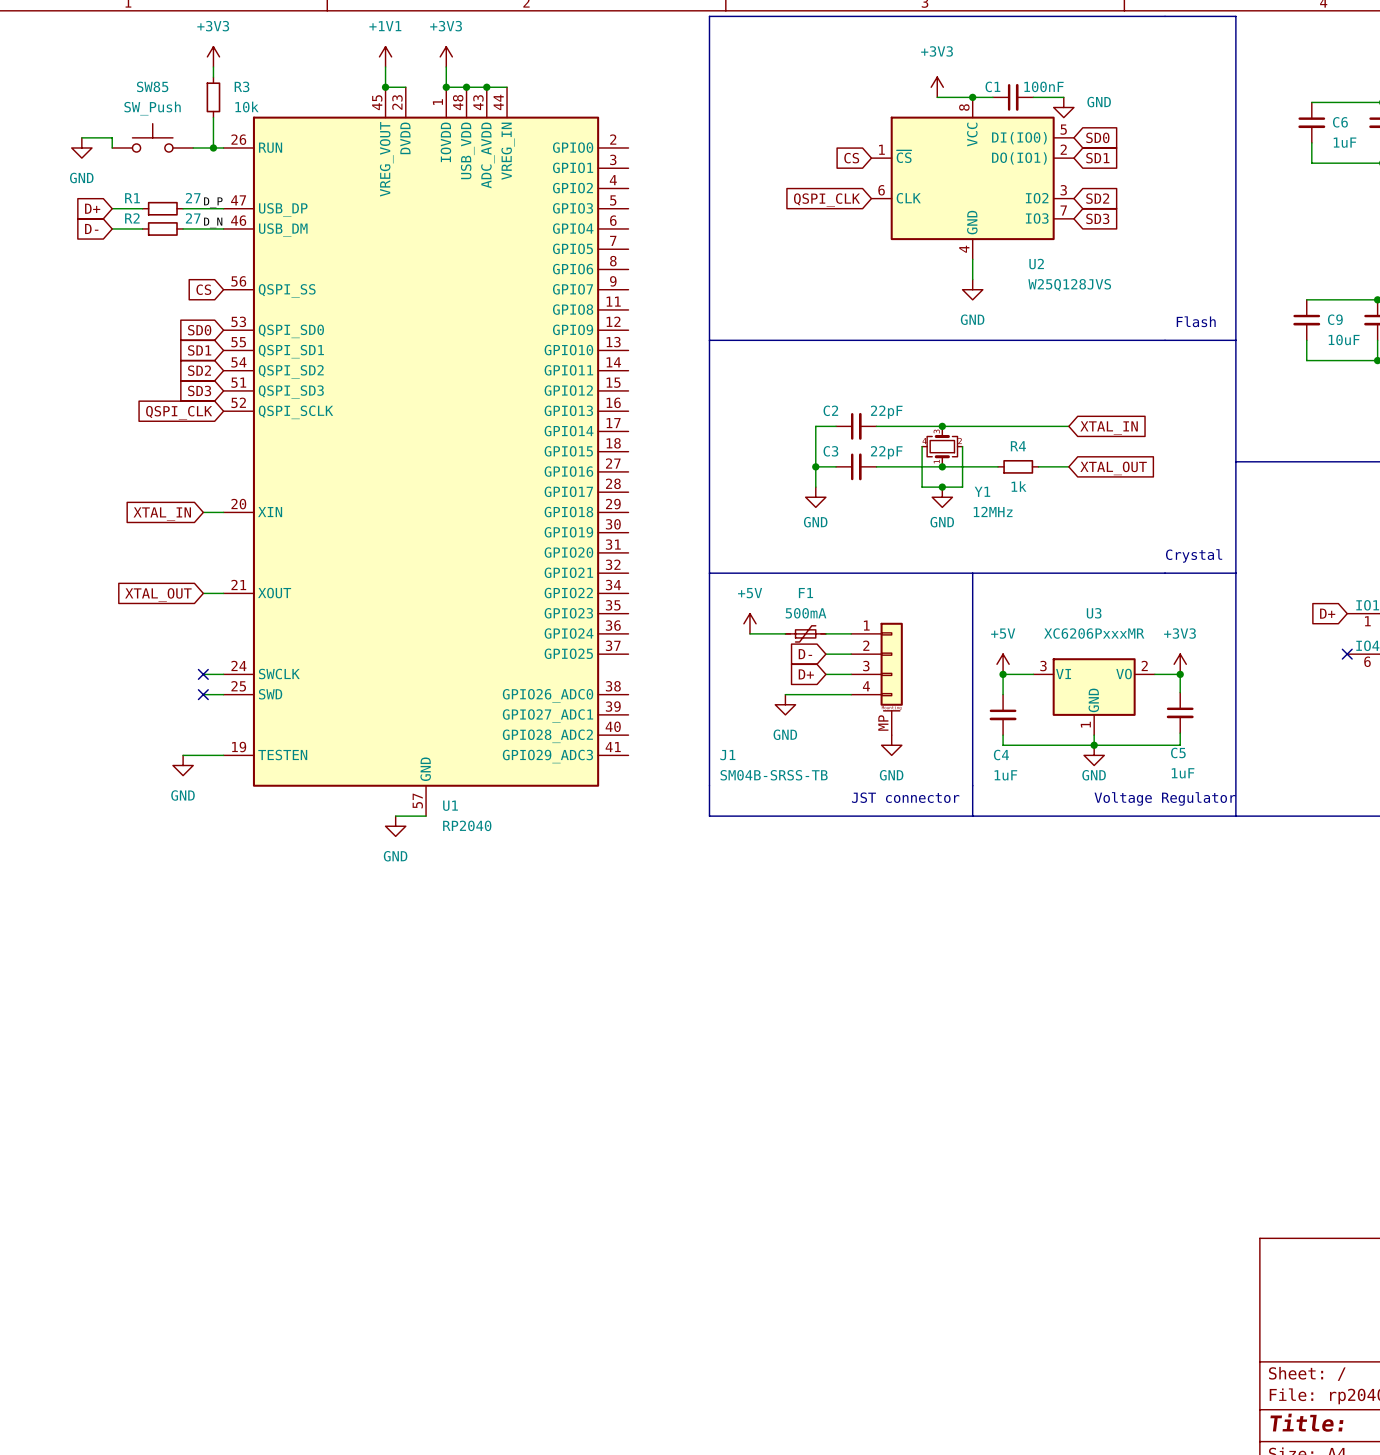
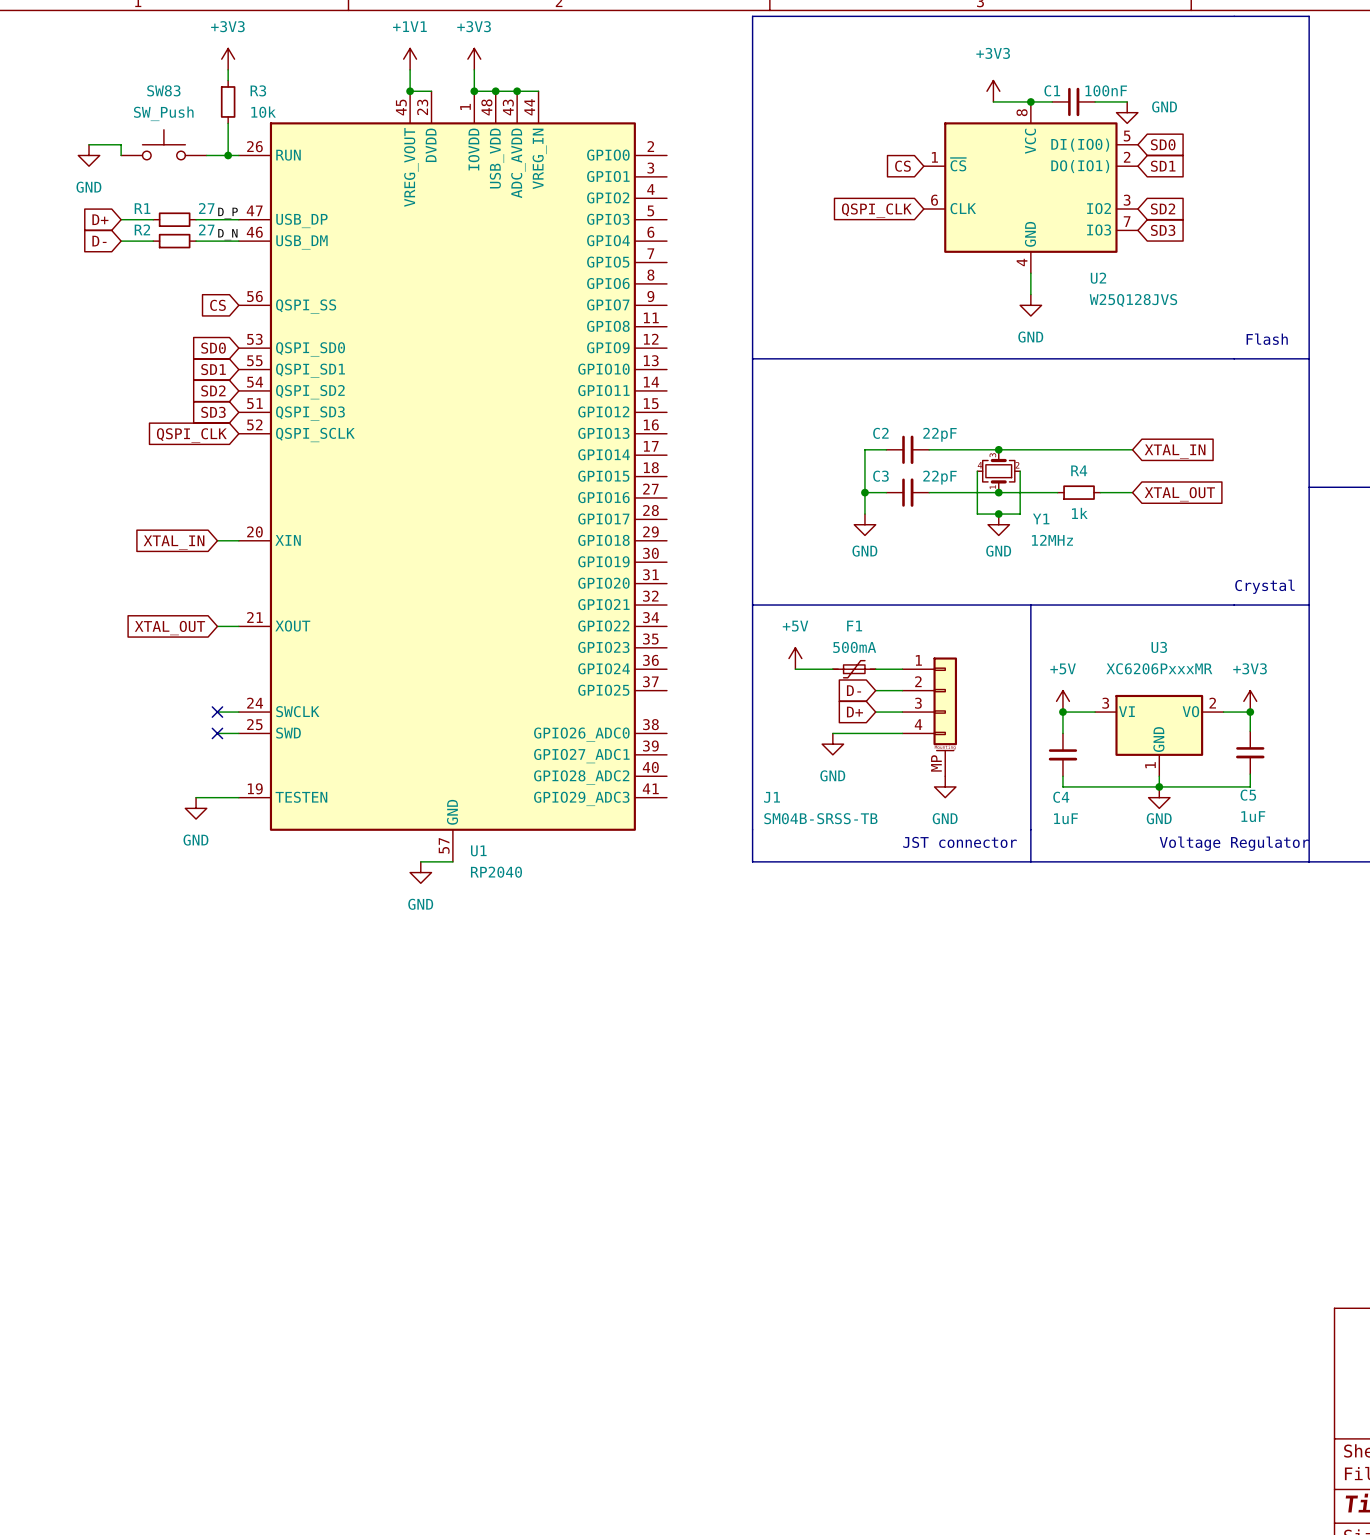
SW85 name: SW85 (152, 86) -> SW83 (163, 90)

